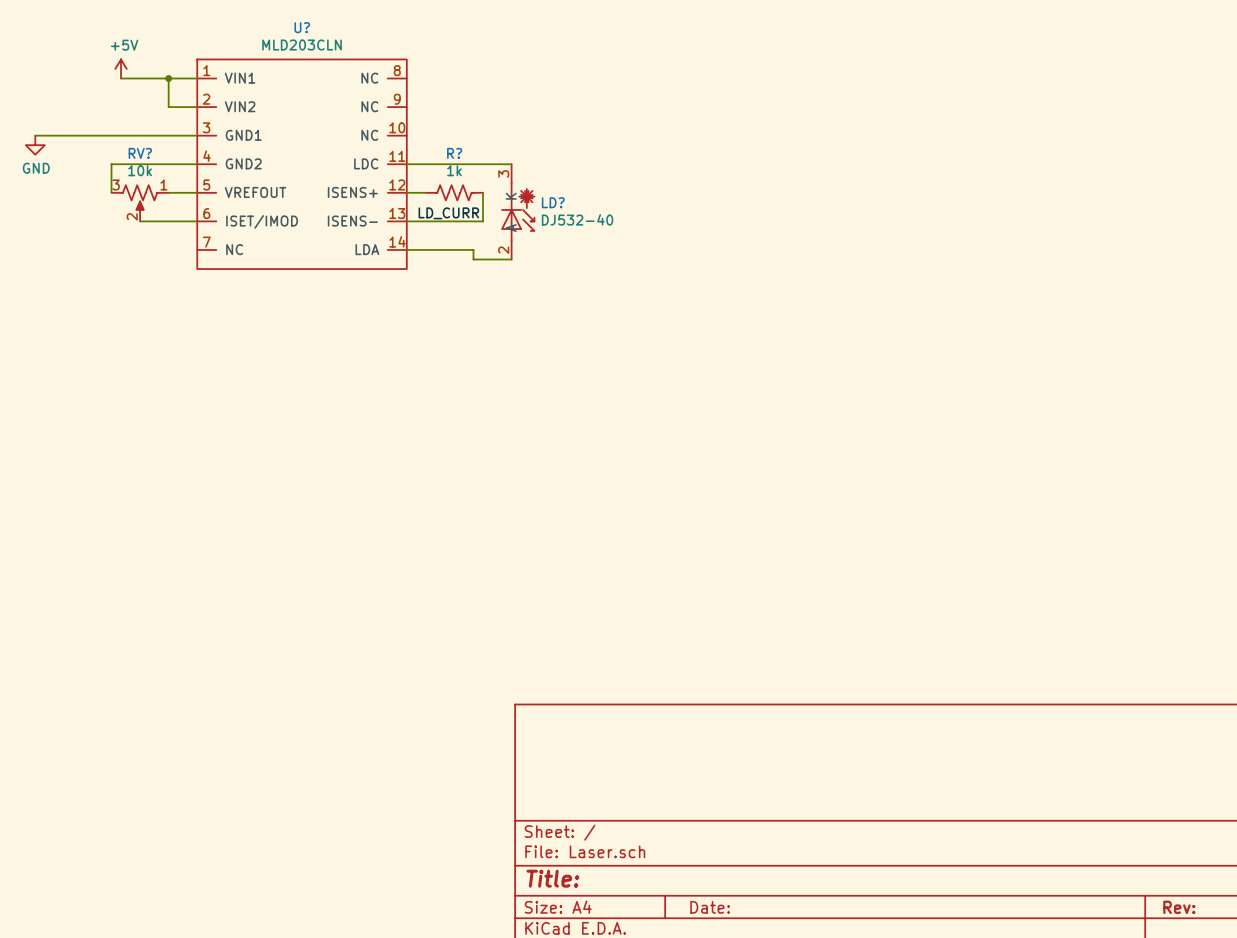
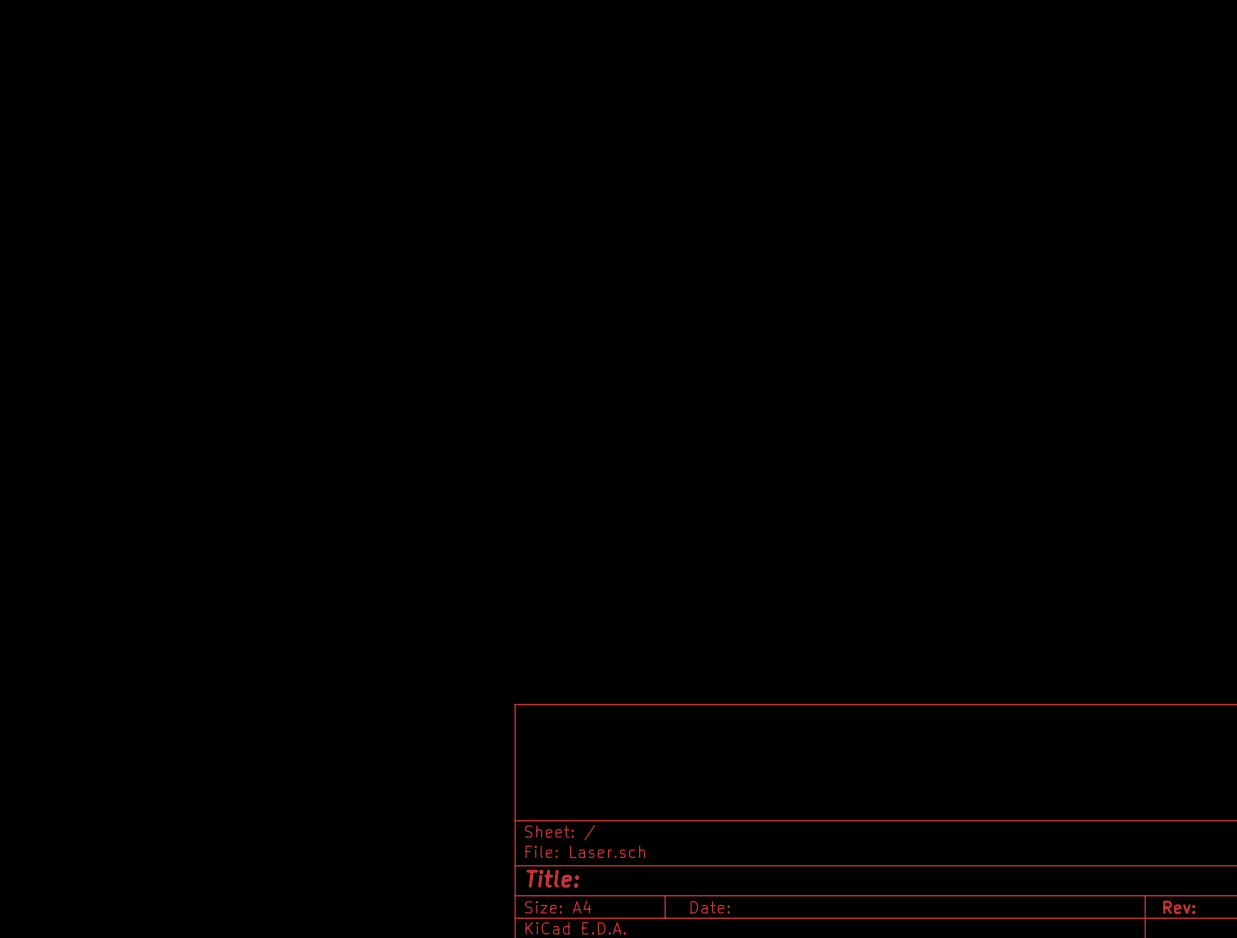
power symbol: +5V (121, 68) -> none
wire: (121, 78) (197, 78) -> none
wire: (168, 78) (168, 107) (197, 107) -> none
junction: (168, 78) -> none
wire: (35, 135) (197, 135) -> none
power symbol: GND (35, 145) -> none
wire: (197, 164) (111, 164) (111, 192) -> none
U?: MLD203CLN (302, 164) -> none
wire: (406, 164) (511, 164) -> none
wire: (168, 192) (197, 192) -> none
wire: (406, 192) (425, 192) -> none
R?: 1k (454, 192) -> none
wire: (483, 192) (483, 221) (406, 221) -> none
RV?: 10k (140, 203) -> none
LD?: DJ532-40 (517, 211) -> none
label: LD_CURR (448, 213) -> none
wire: (140, 221) (197, 221) -> none
wire: (406, 249) (473, 249) (473, 259) (511, 259) -> none

